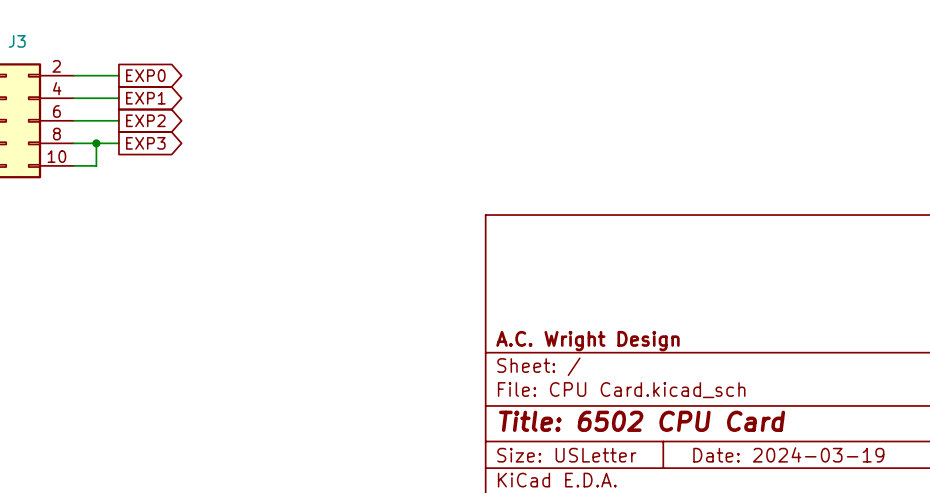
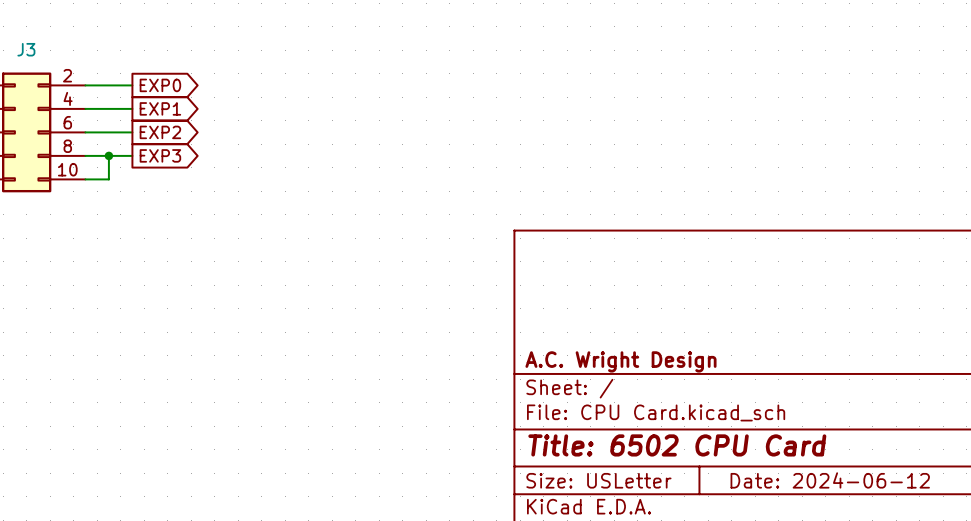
title block: Date: 2024-03-19 (788, 454) -> Date: 2024-06-12 (830, 480)

